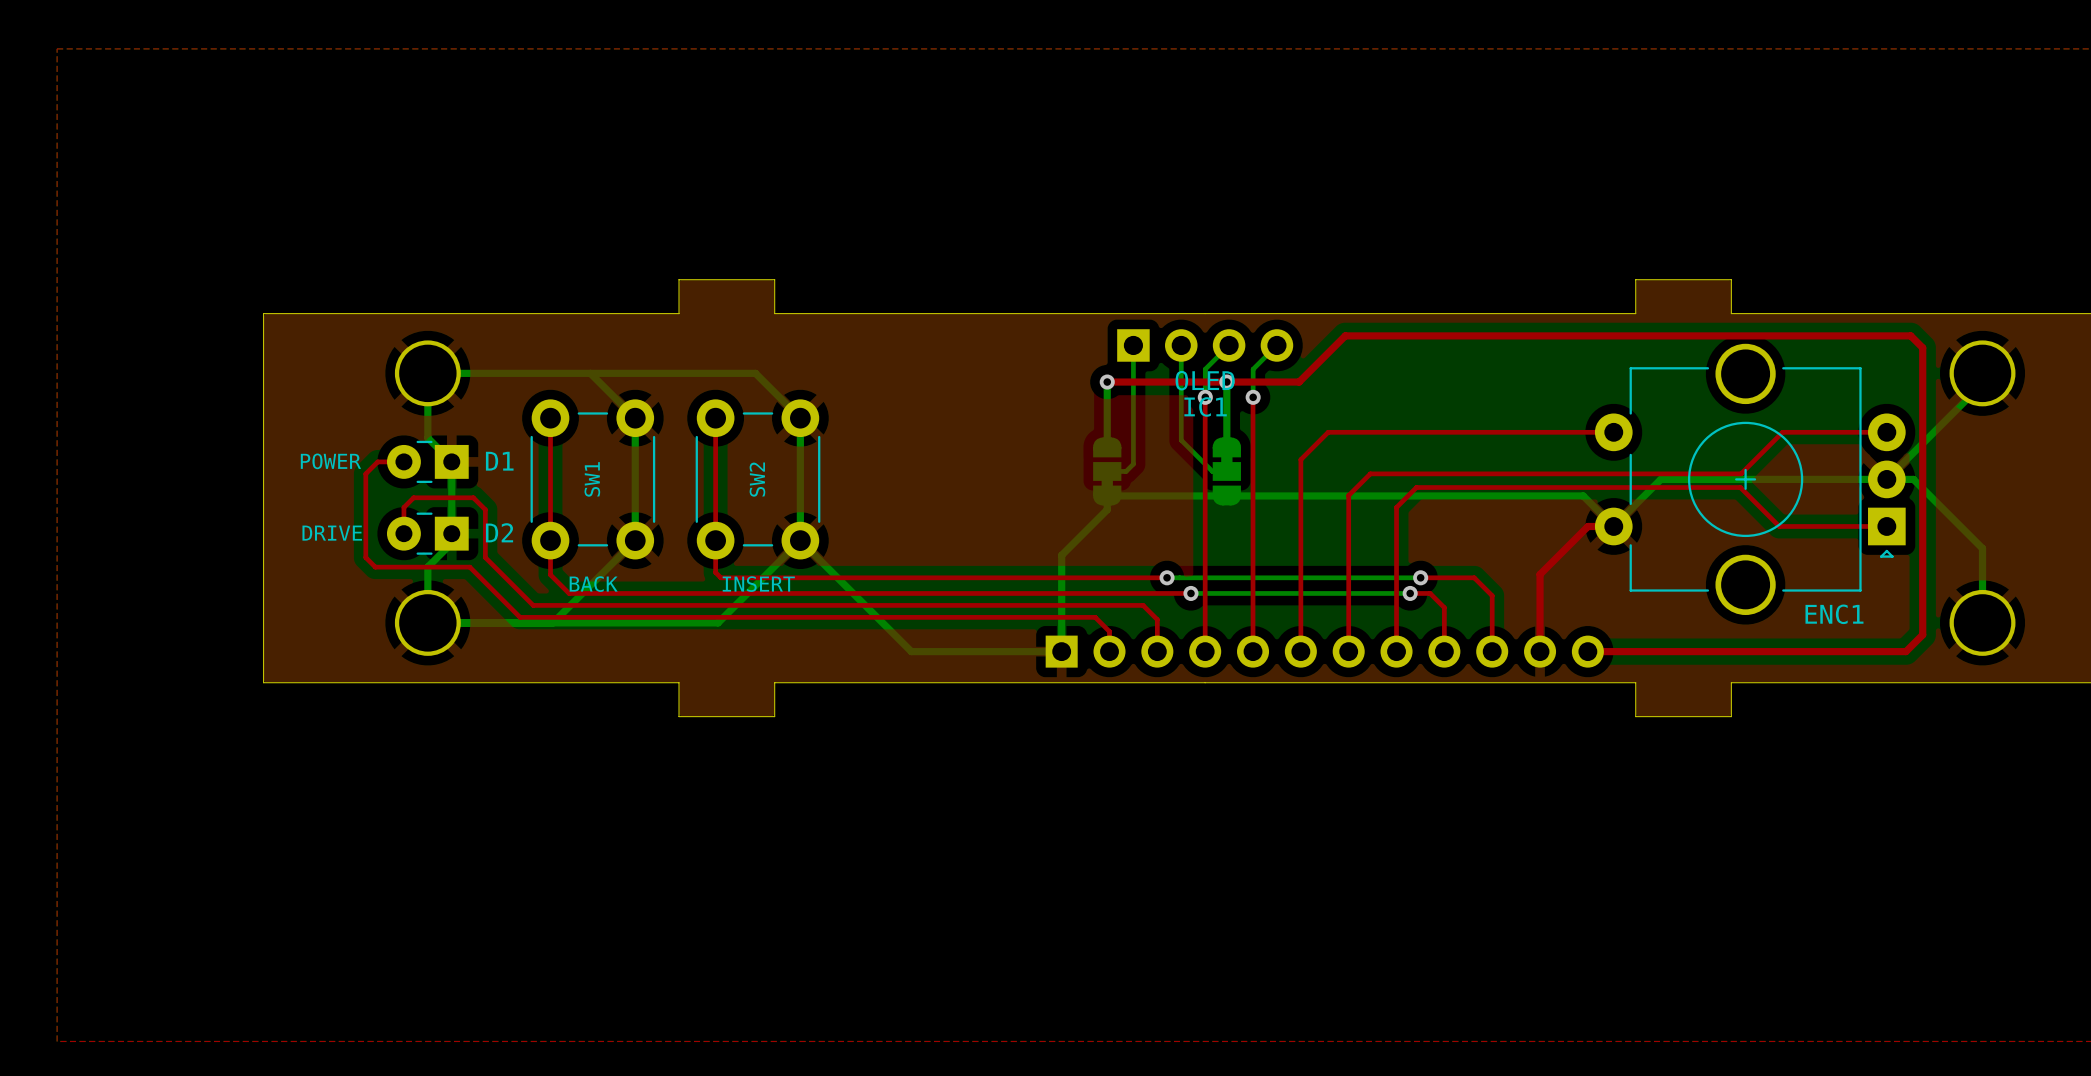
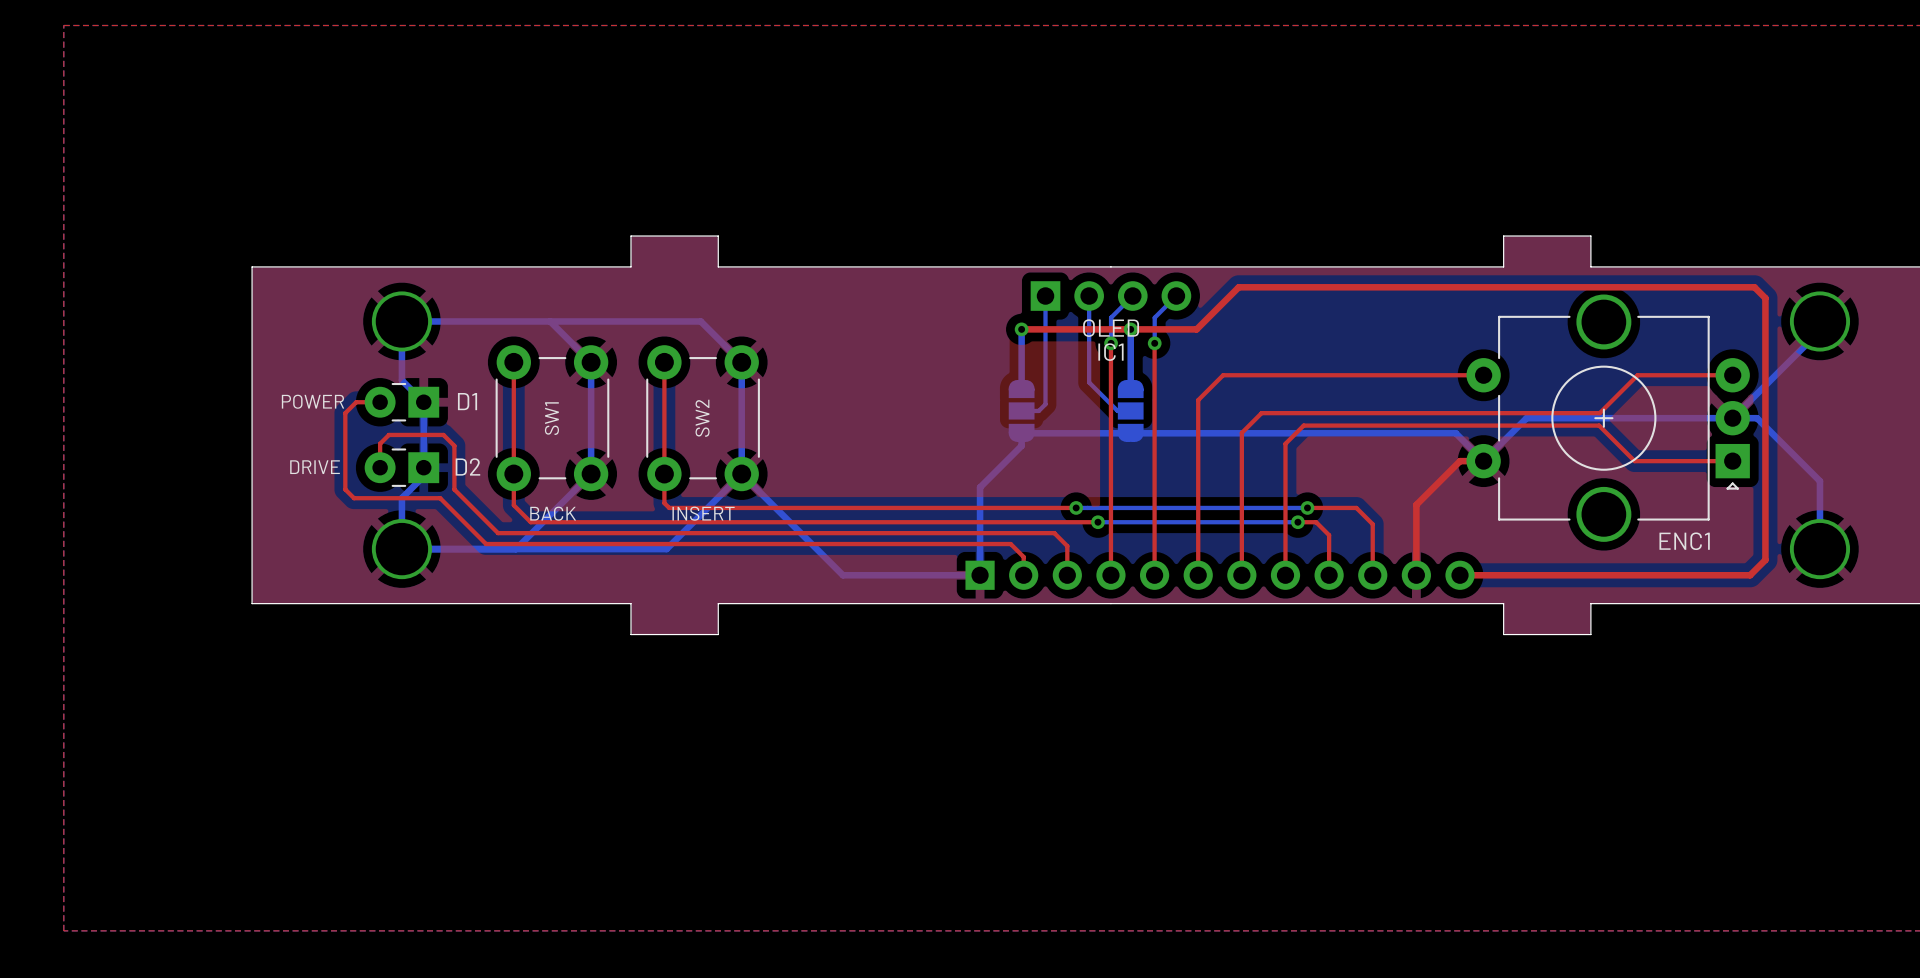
part footprint: [1093, 437, 1122, 506] -> [1008, 380, 1035, 442]
part footprint: [1212, 437, 1241, 506] -> [1117, 380, 1144, 442]

